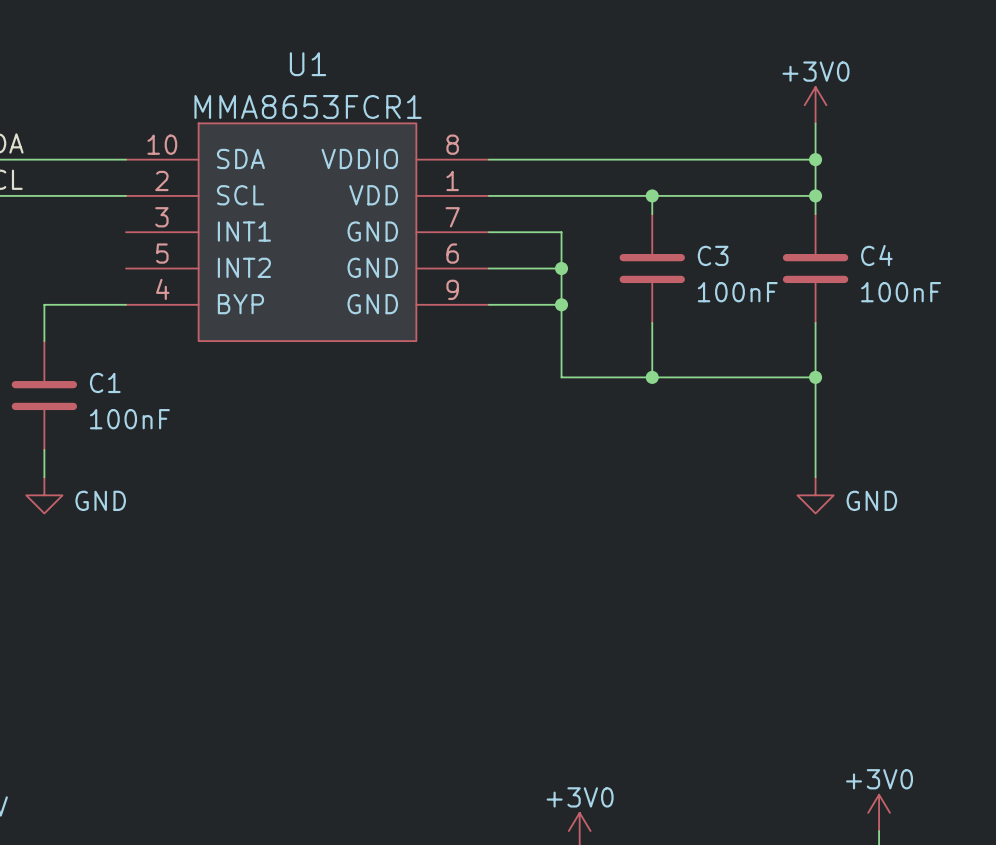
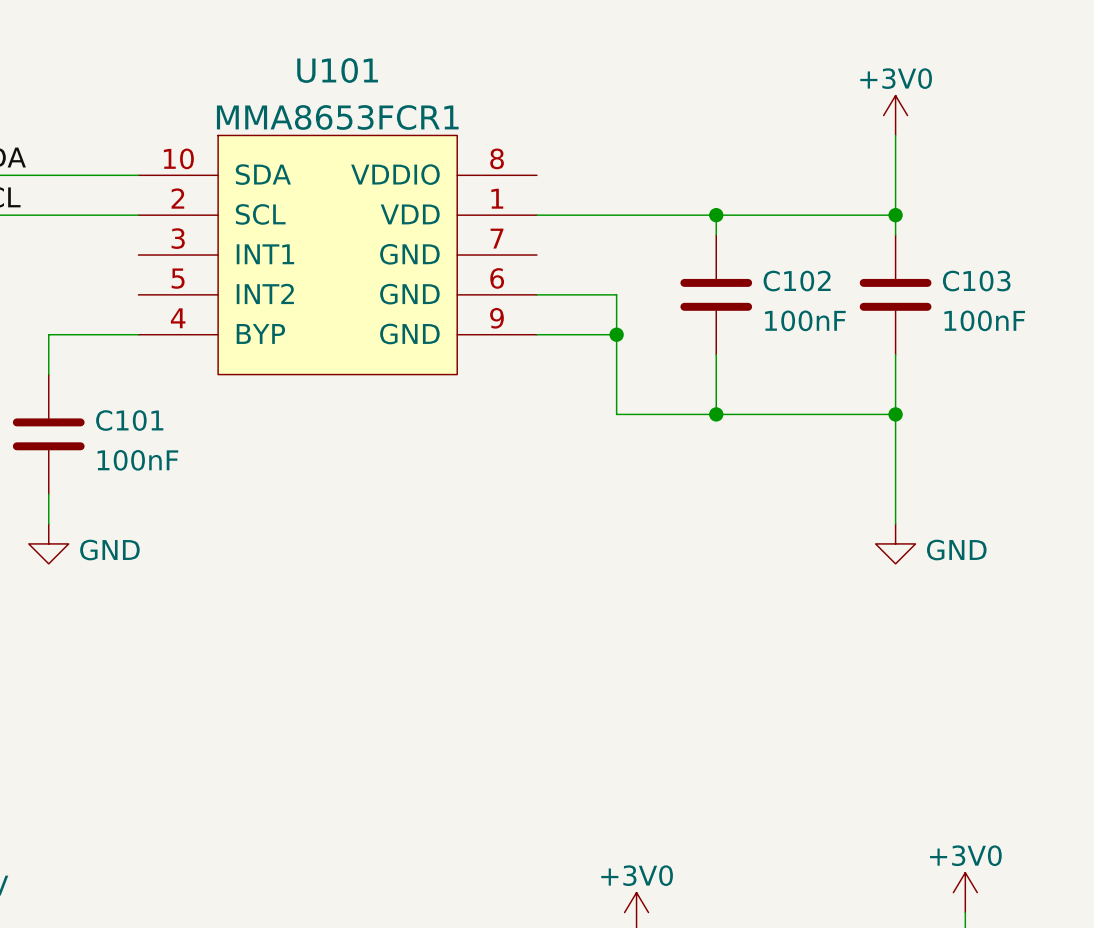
U1 name: U1 (308, 64) -> U101 (337, 70)
wire: (488, 159) (815, 159) -> none
junction: (815, 159) -> none
wire: (488, 232) (561, 232) (561, 268) -> none
C3 name: C3 (713, 255) -> C102 (797, 281)
C4 name: C4 (876, 255) -> C103 (976, 281)
junction: (561, 268) -> none
C1 name: C1 (105, 382) -> C101 (129, 420)

